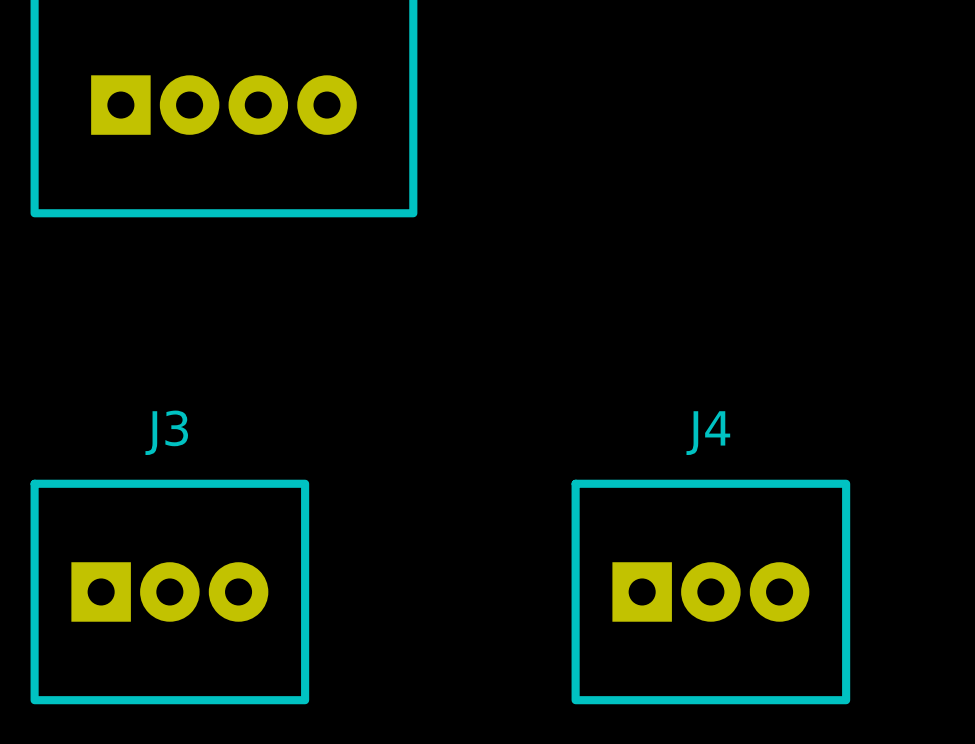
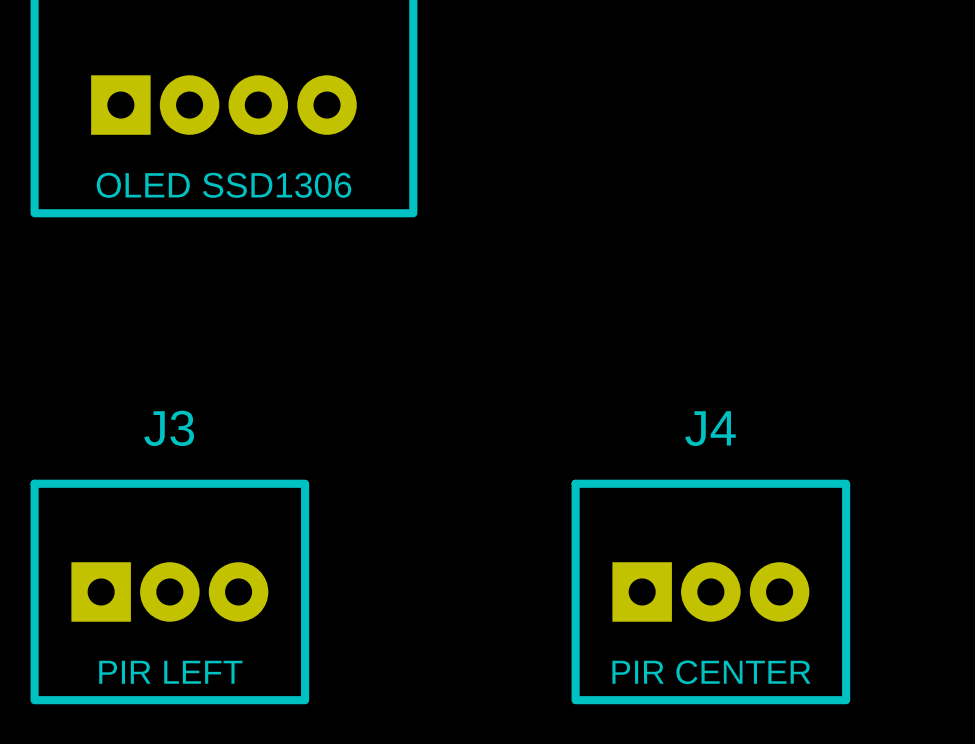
part text: none -> OLED SSD1306 (224, 185)
J3 text: none -> PIR LEFT (170, 672)
J4 text: none -> PIR CENTER (711, 672)

